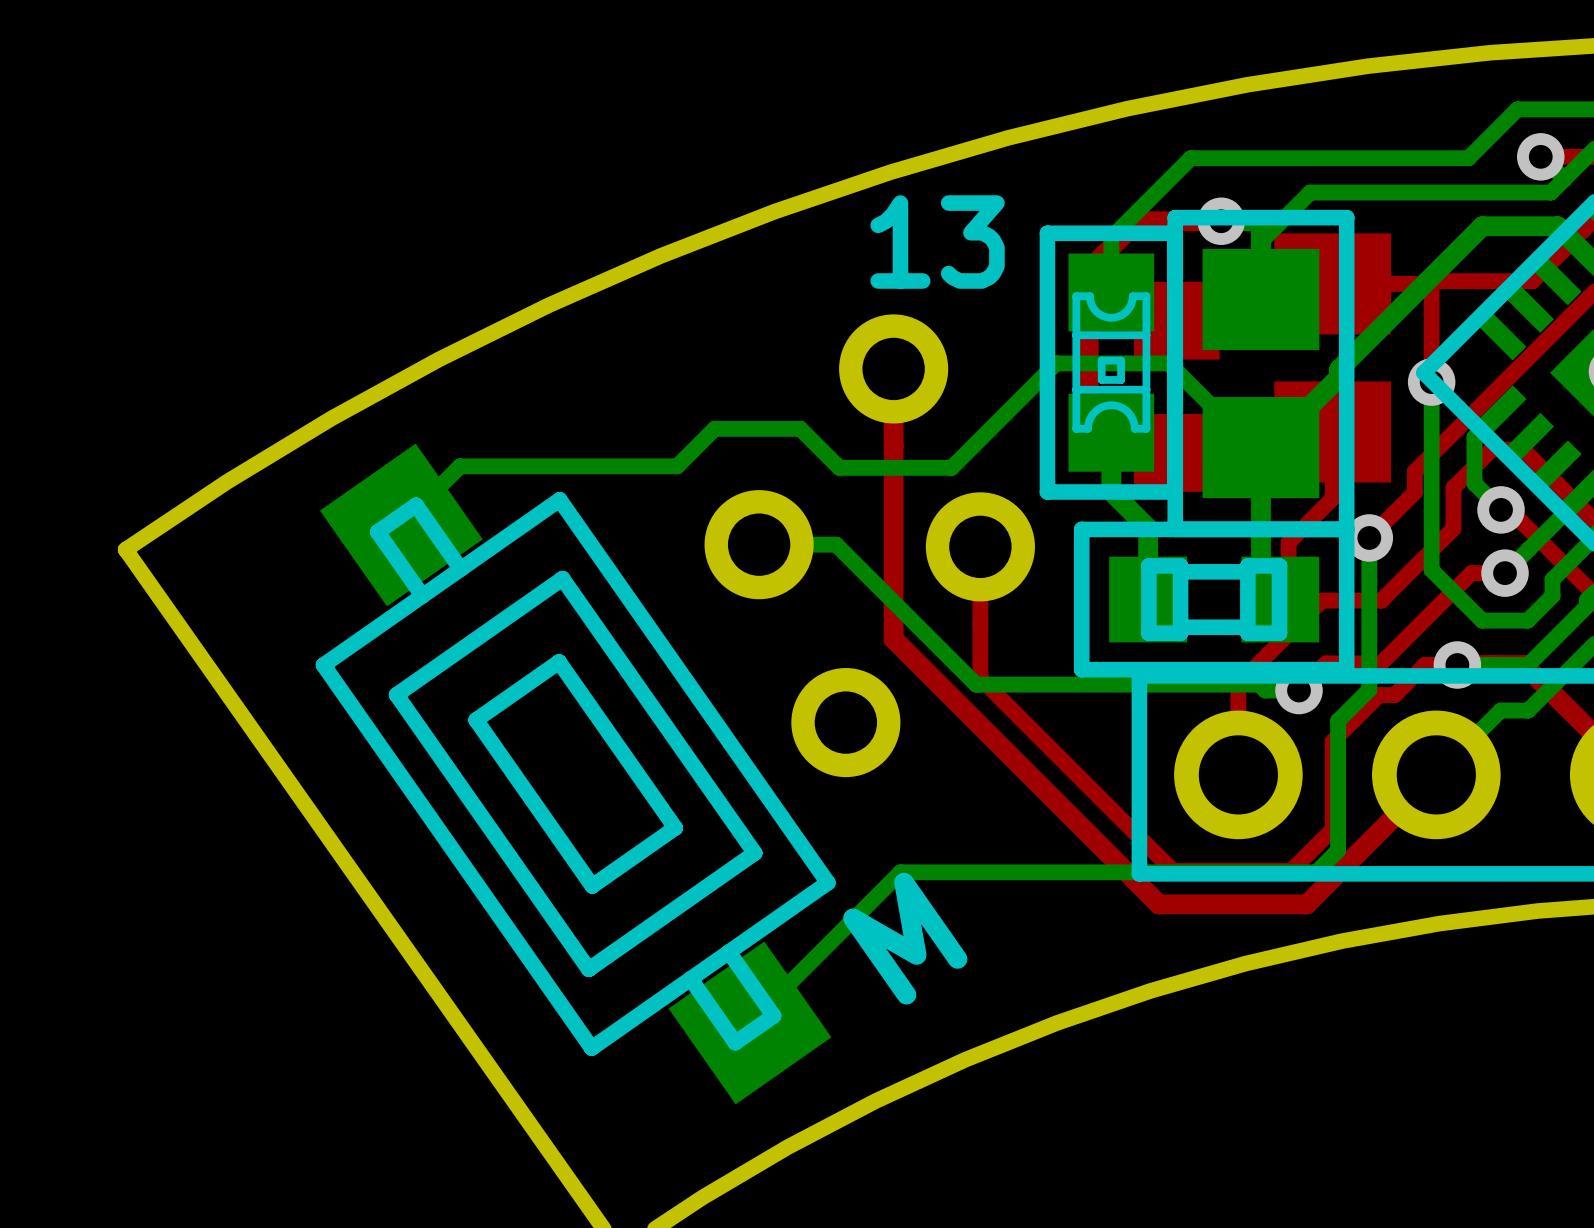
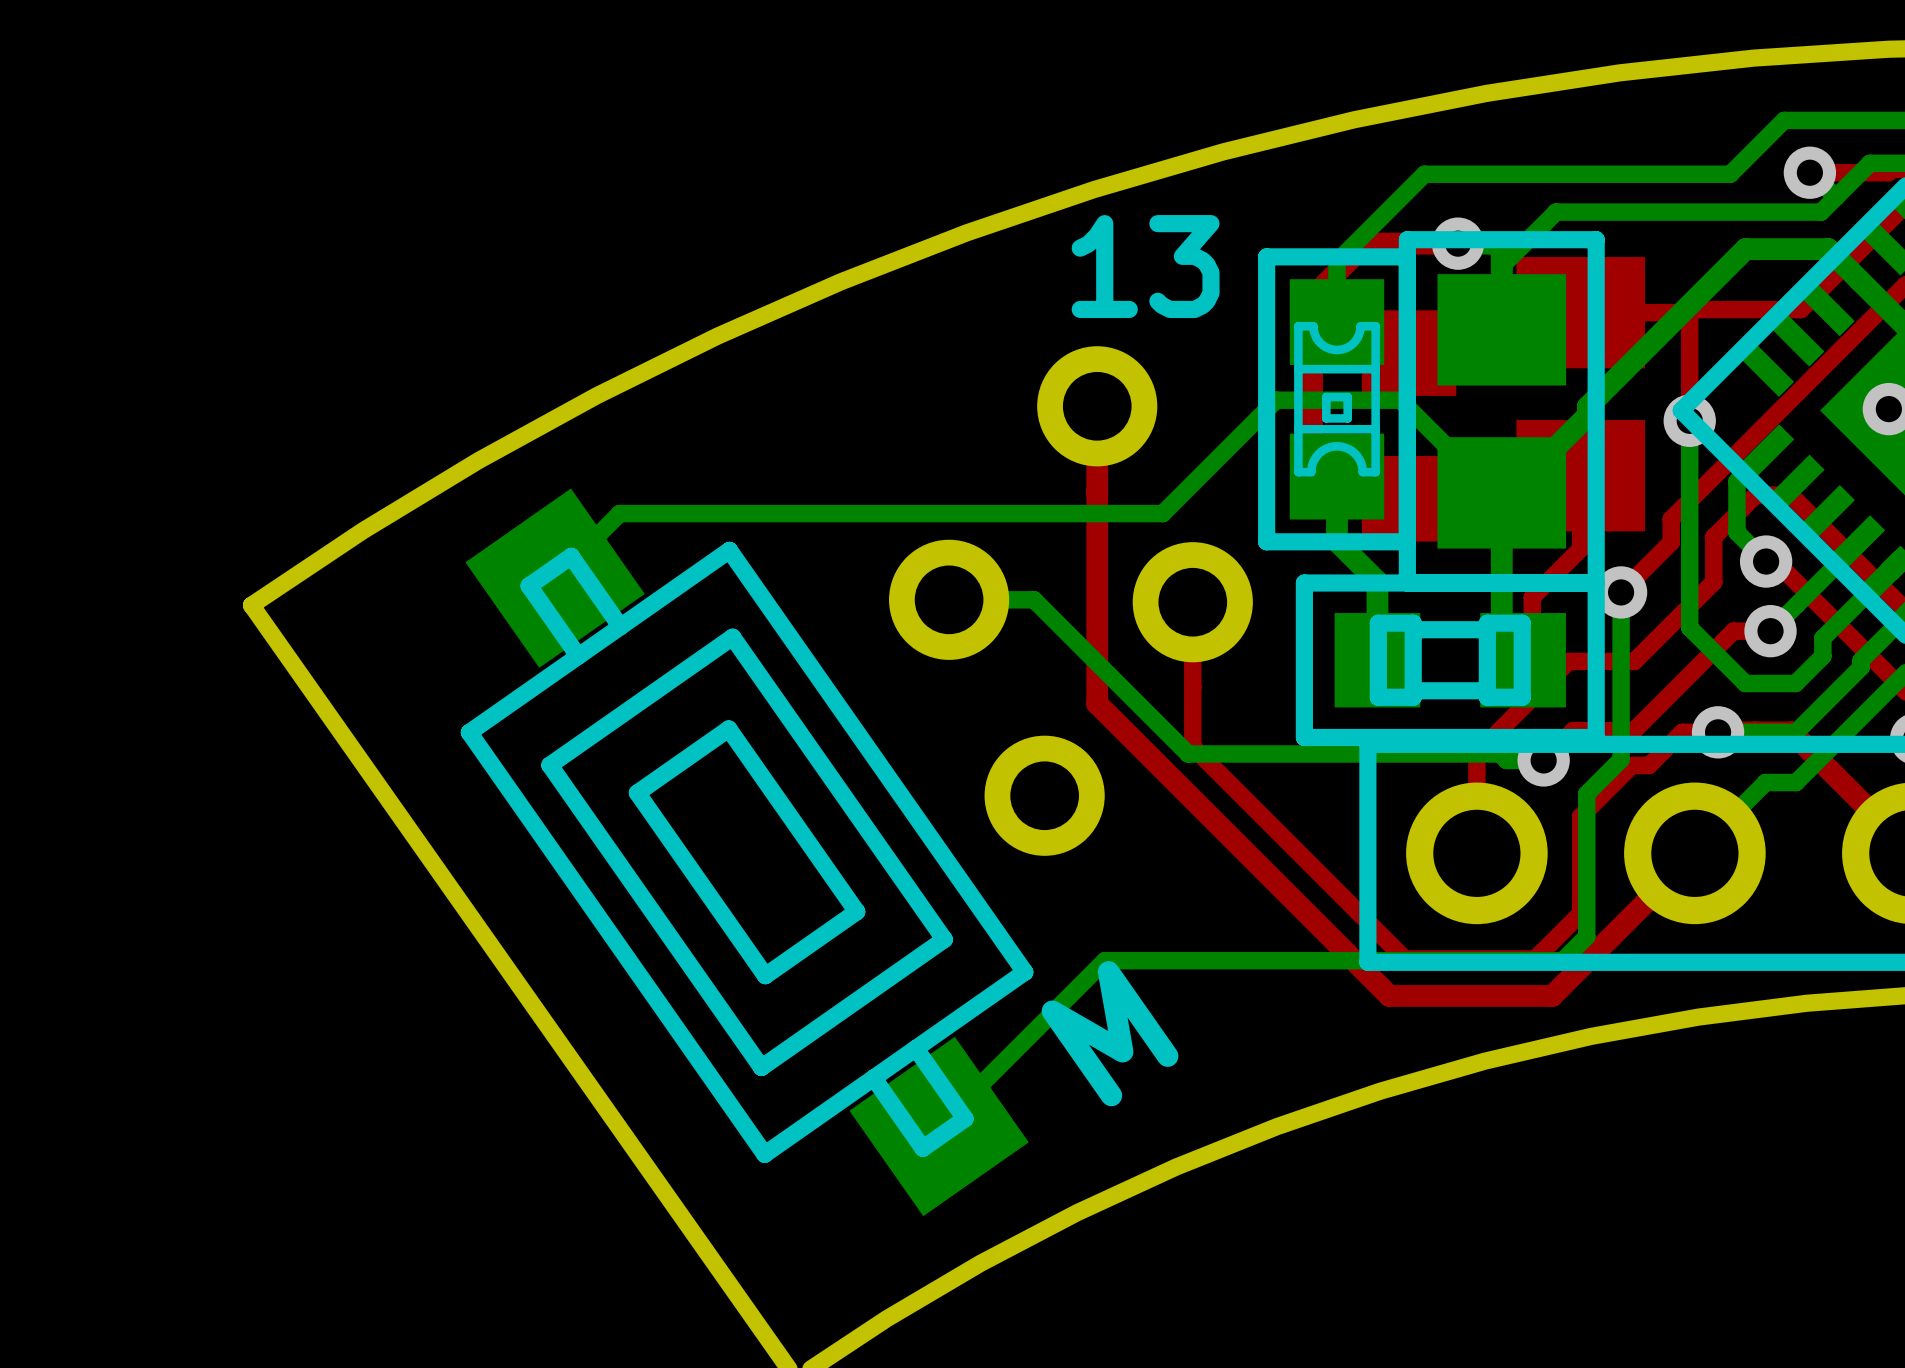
bottom track: (953, 466) (839, 467) (800, 428) (714, 428) (677, 466) -> (1162, 513) (858, 513)

